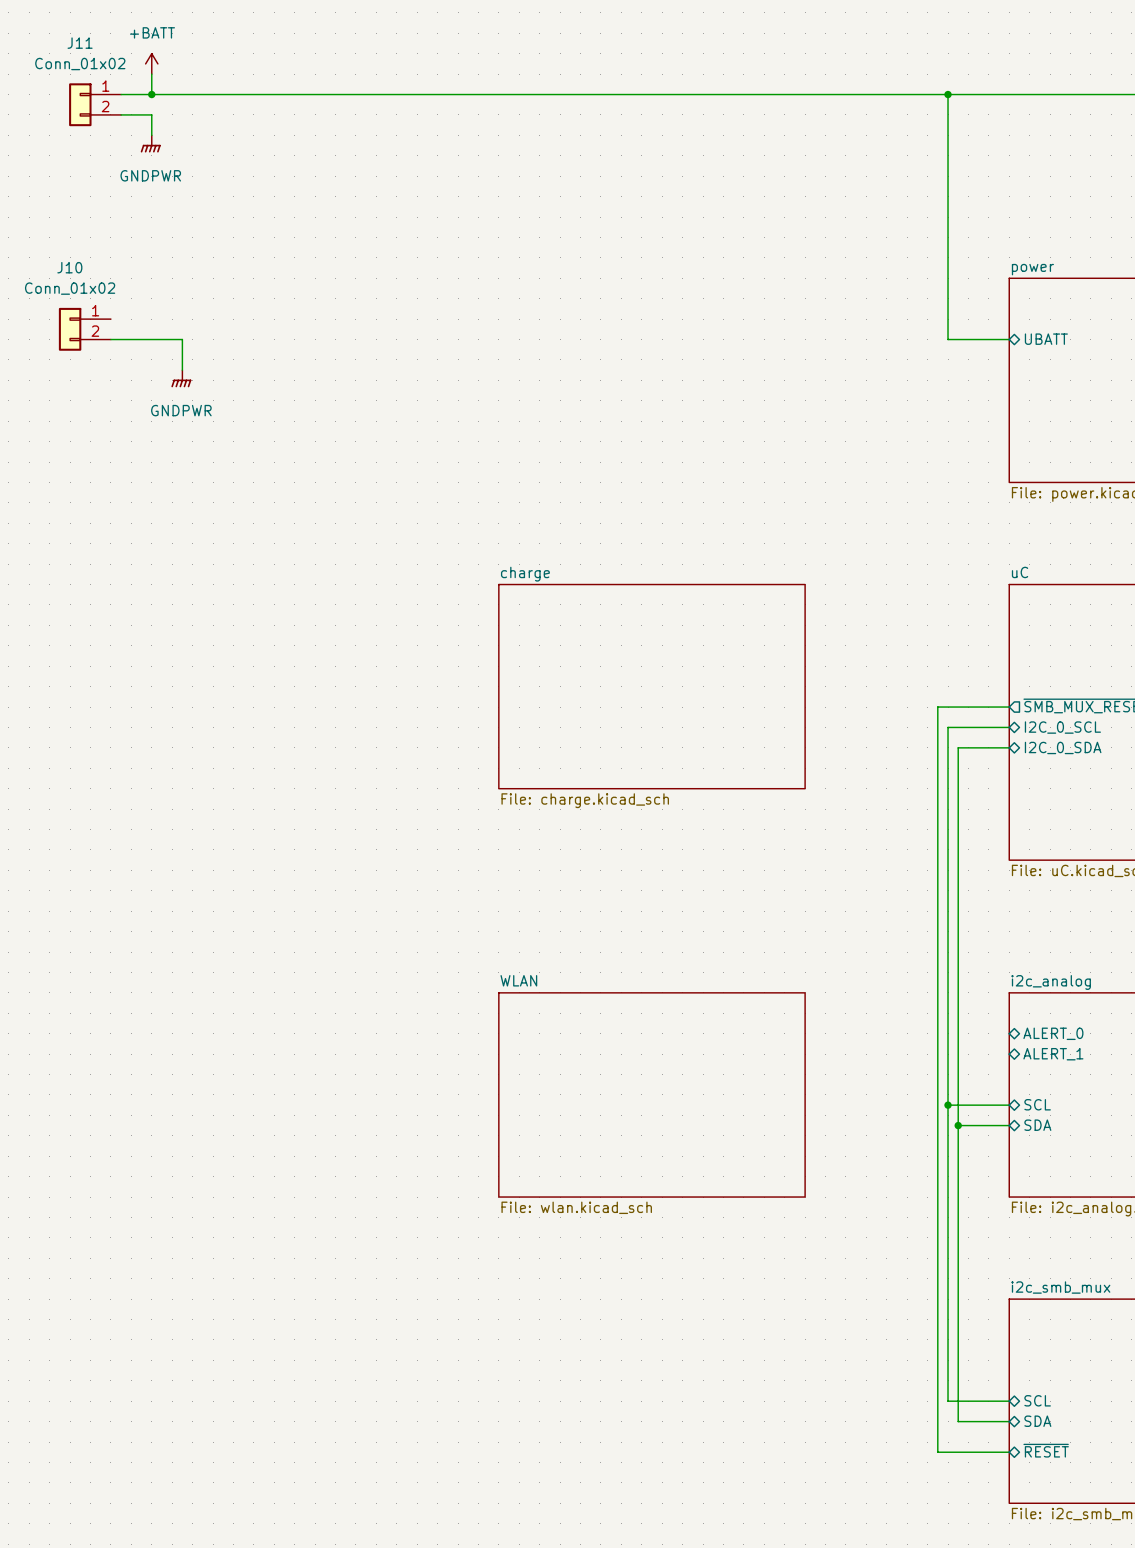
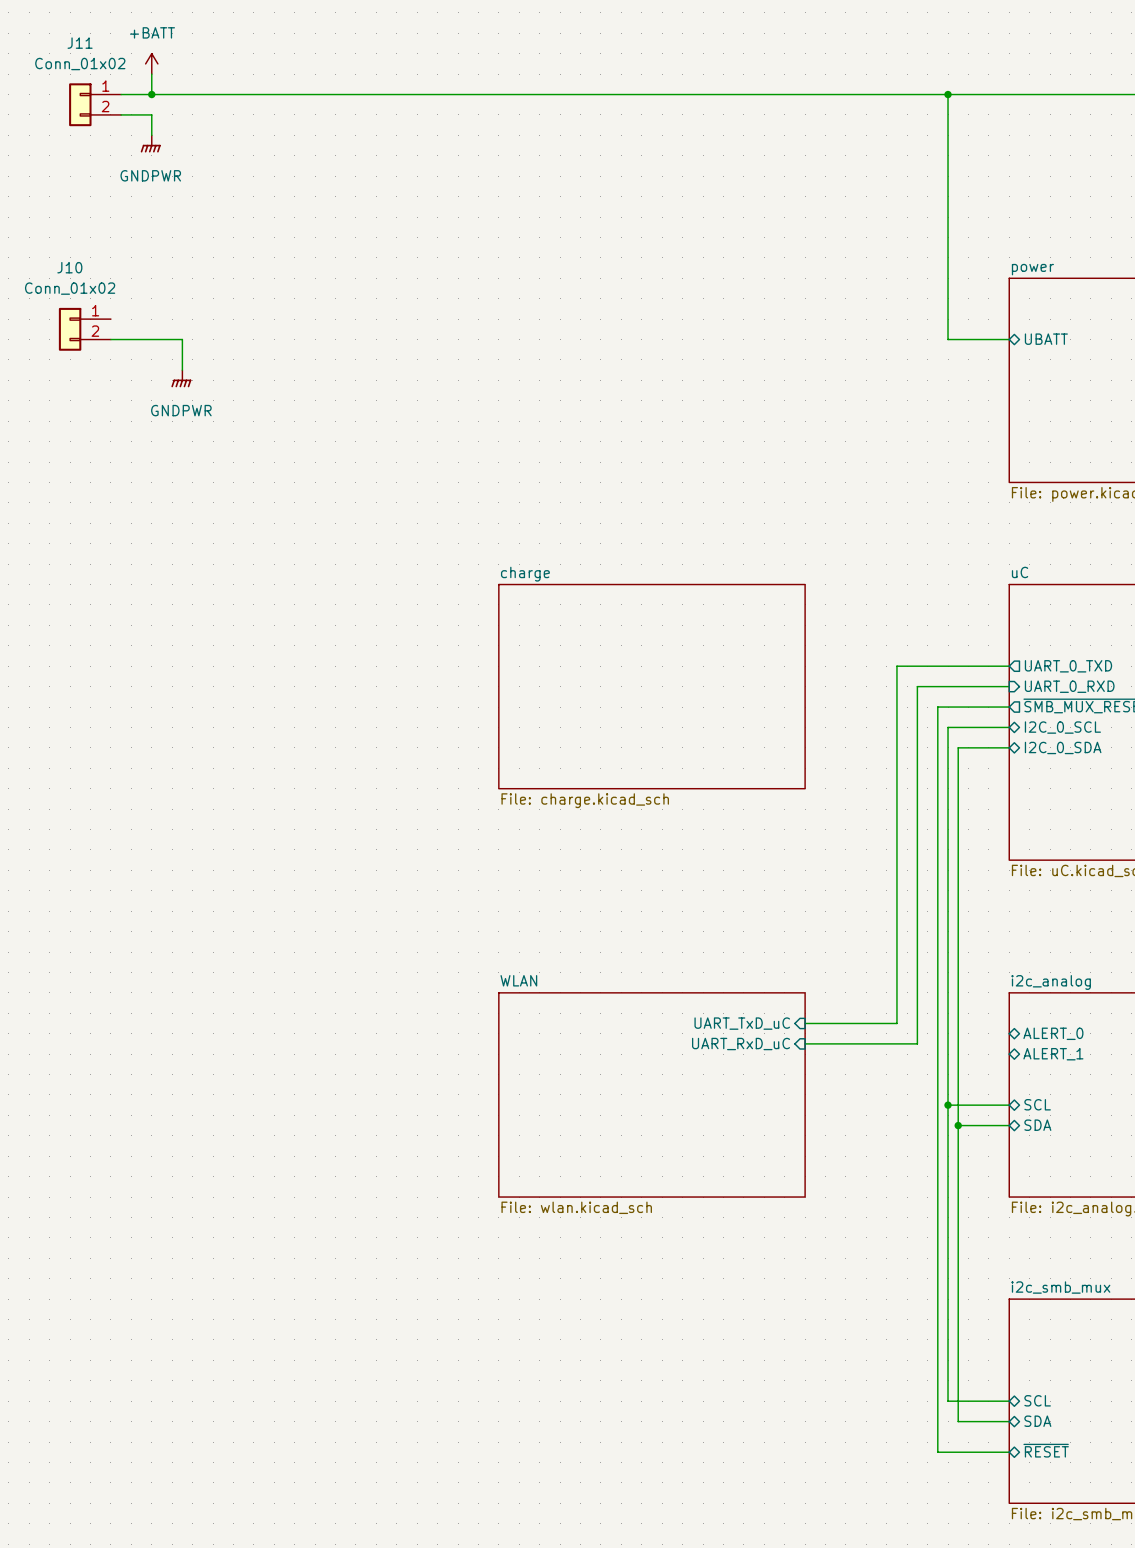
wire: none -> (1009, 666) (896, 666) (896, 1023) (805, 1023)
sheet pin: none -> UART_0_TXD (1068, 666)
wire: none -> (1009, 686) (917, 686) (917, 1043) (805, 1043)
sheet pin: none -> UART_0_RXD (1069, 686)
sheet pin: none -> UART_TxD_uC (742, 1023)
sheet pin: none -> UART_RxD_uC (741, 1044)

